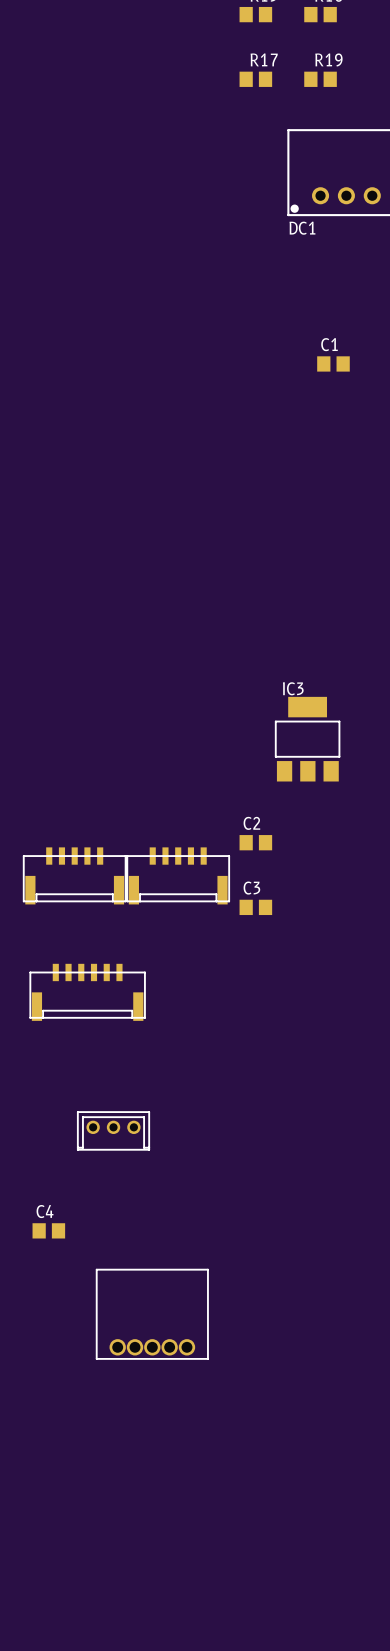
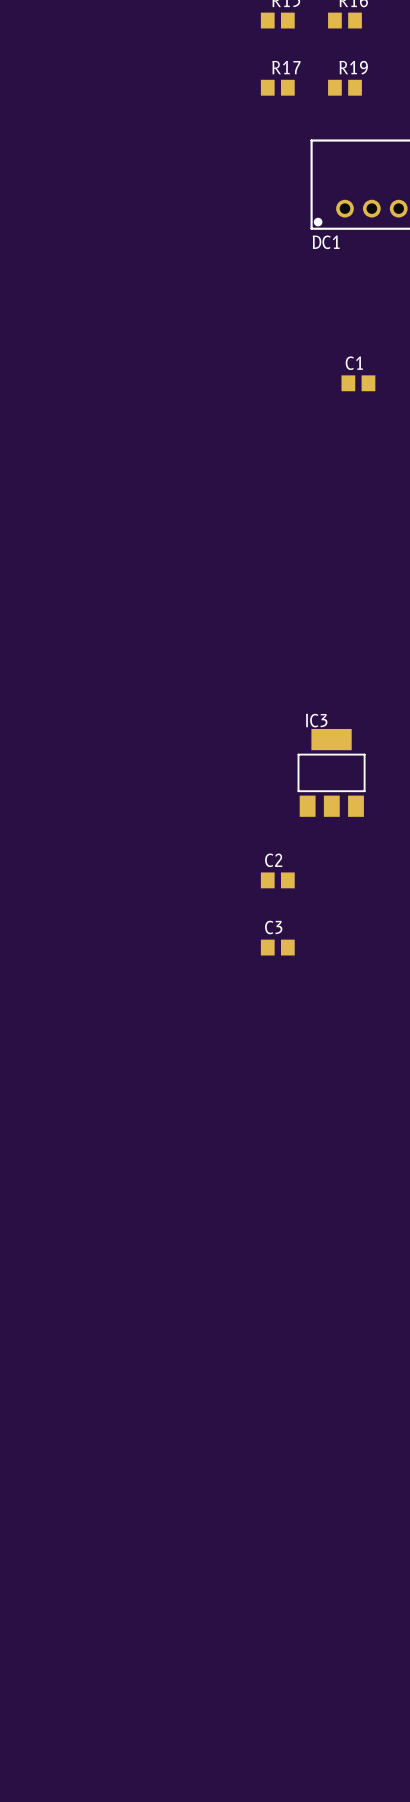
part: (74, 875) -> none
part: (178, 875) -> none
part: (87, 992) -> none
part: (113, 1130) -> none
C4: (48, 1230) -> none
part: (152, 1314) -> none

